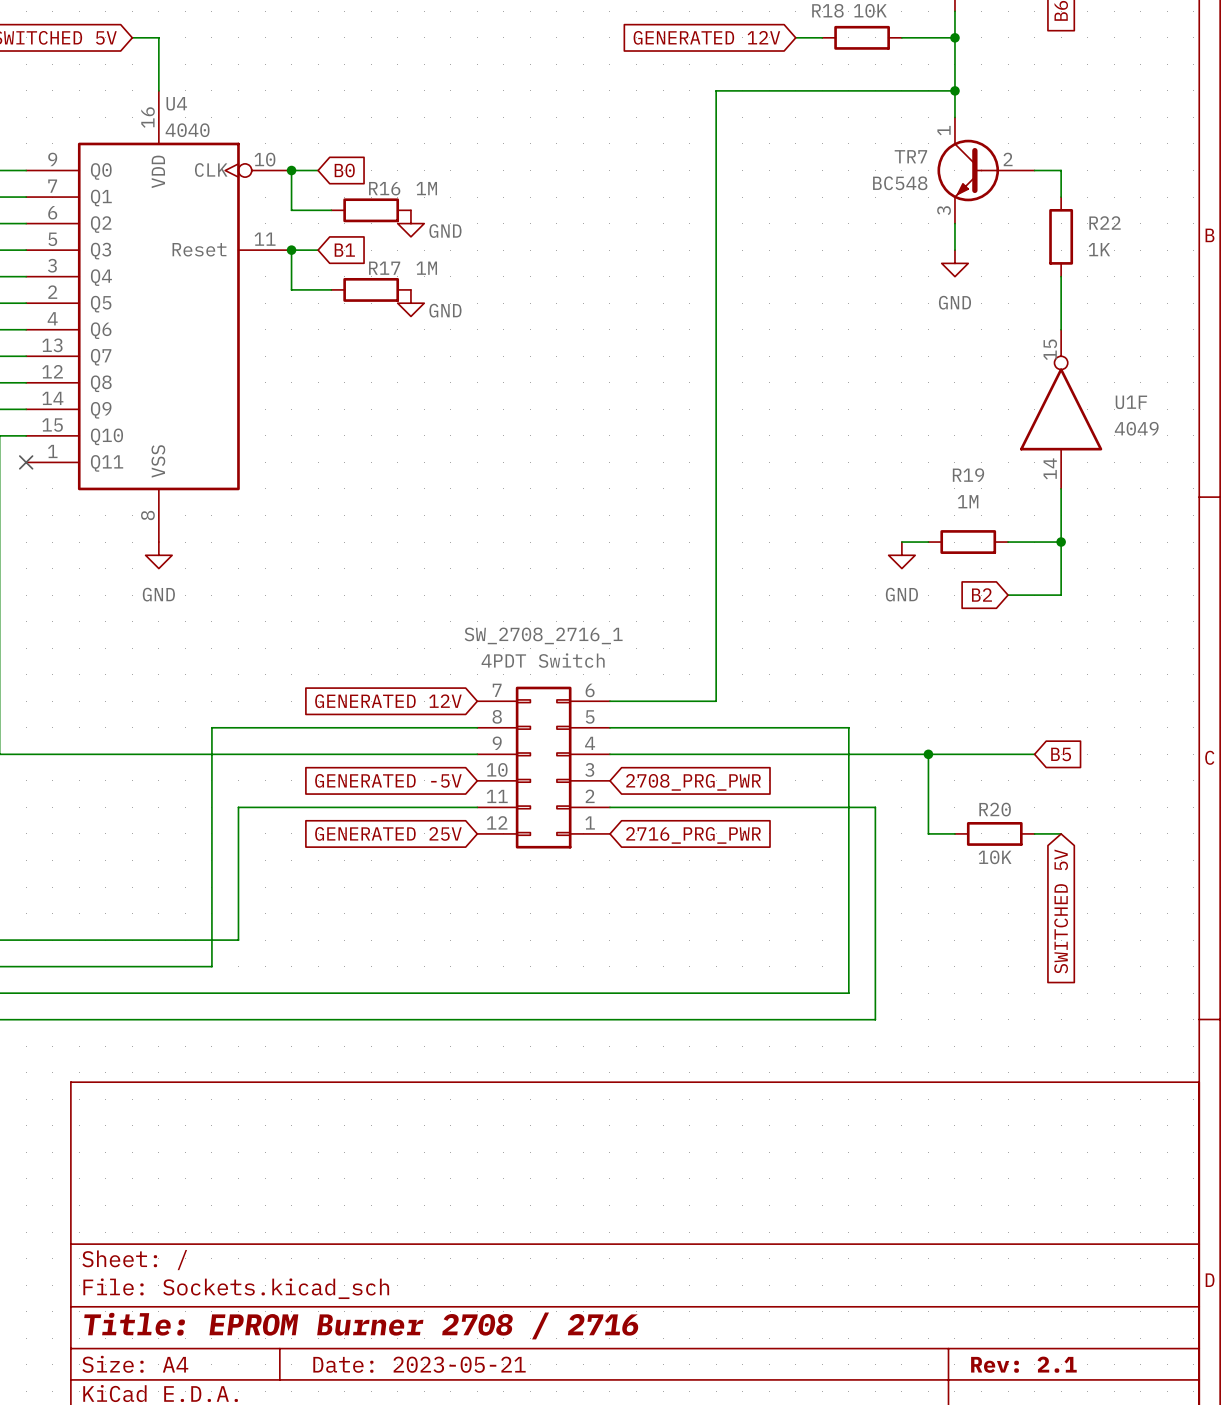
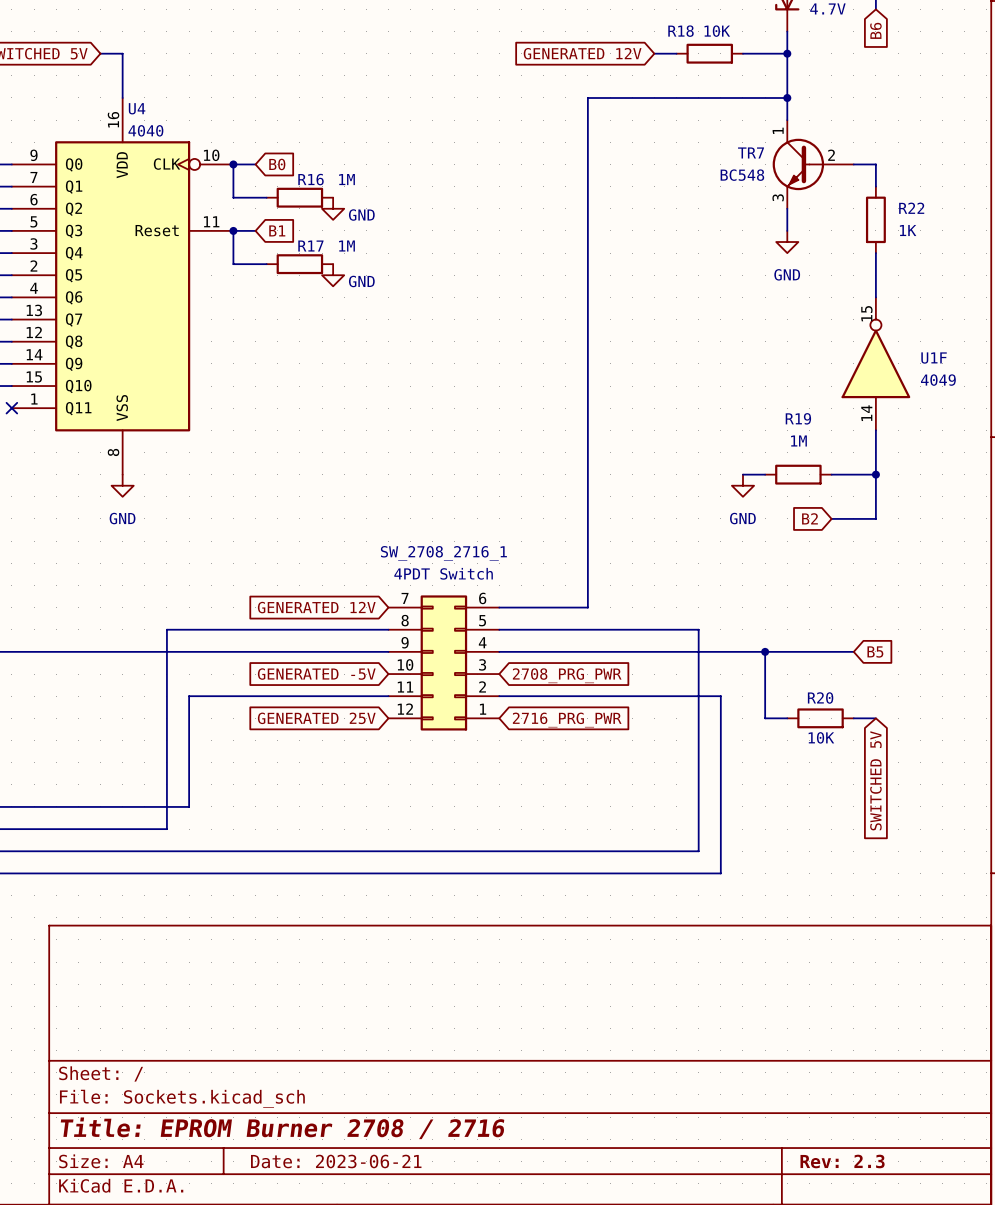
title block: Date: 2023-05-21 (419, 1364) -> Date: 2023-06-21 (336, 1161)
title block: Rev: 2.1 (1023, 1364) -> Rev: 2.3 (842, 1161)

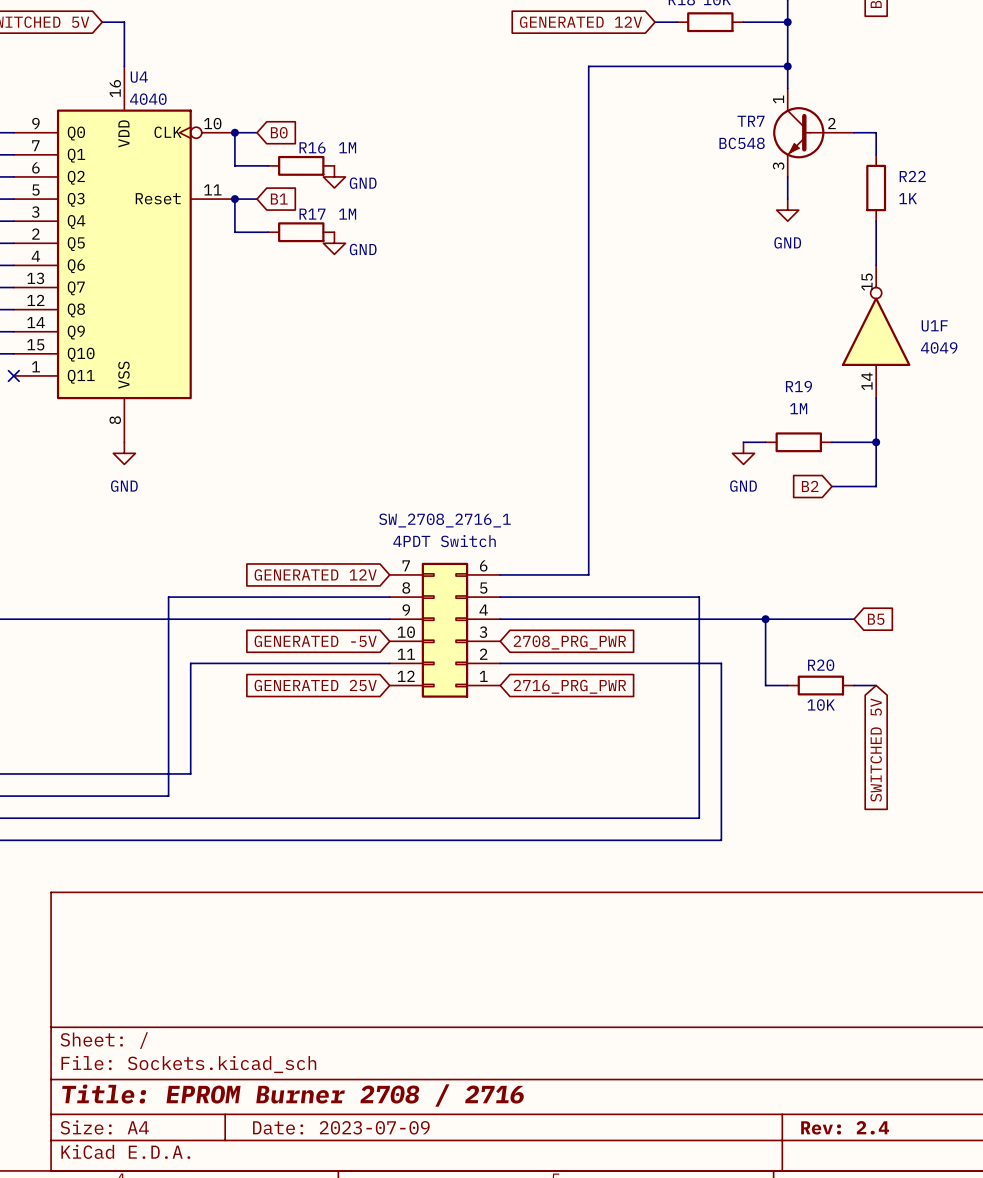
title block: Date: 2023-06-21 (336, 1161) -> Date: 2023-07-09 (341, 1127)
title block: Rev: 2.3 (842, 1161) -> Rev: 2.4 (845, 1127)

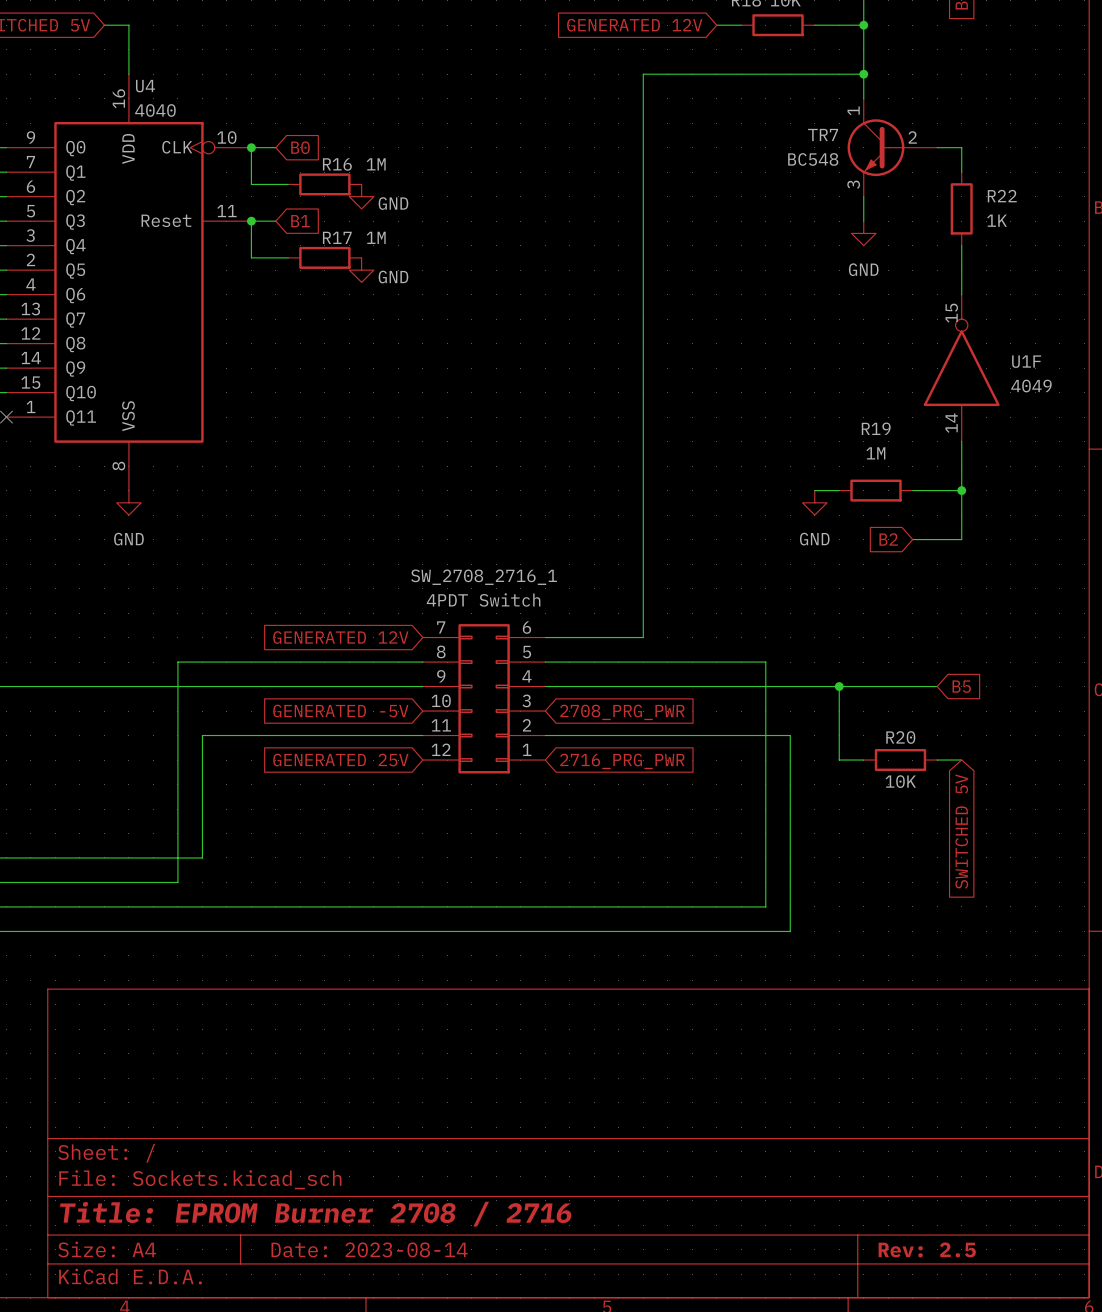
title block: Date: 2023-07-09 (341, 1127) -> Date: 2023-08-14 (369, 1249)
title block: Rev: 2.4 (845, 1127) -> Rev: 2.5 (927, 1249)

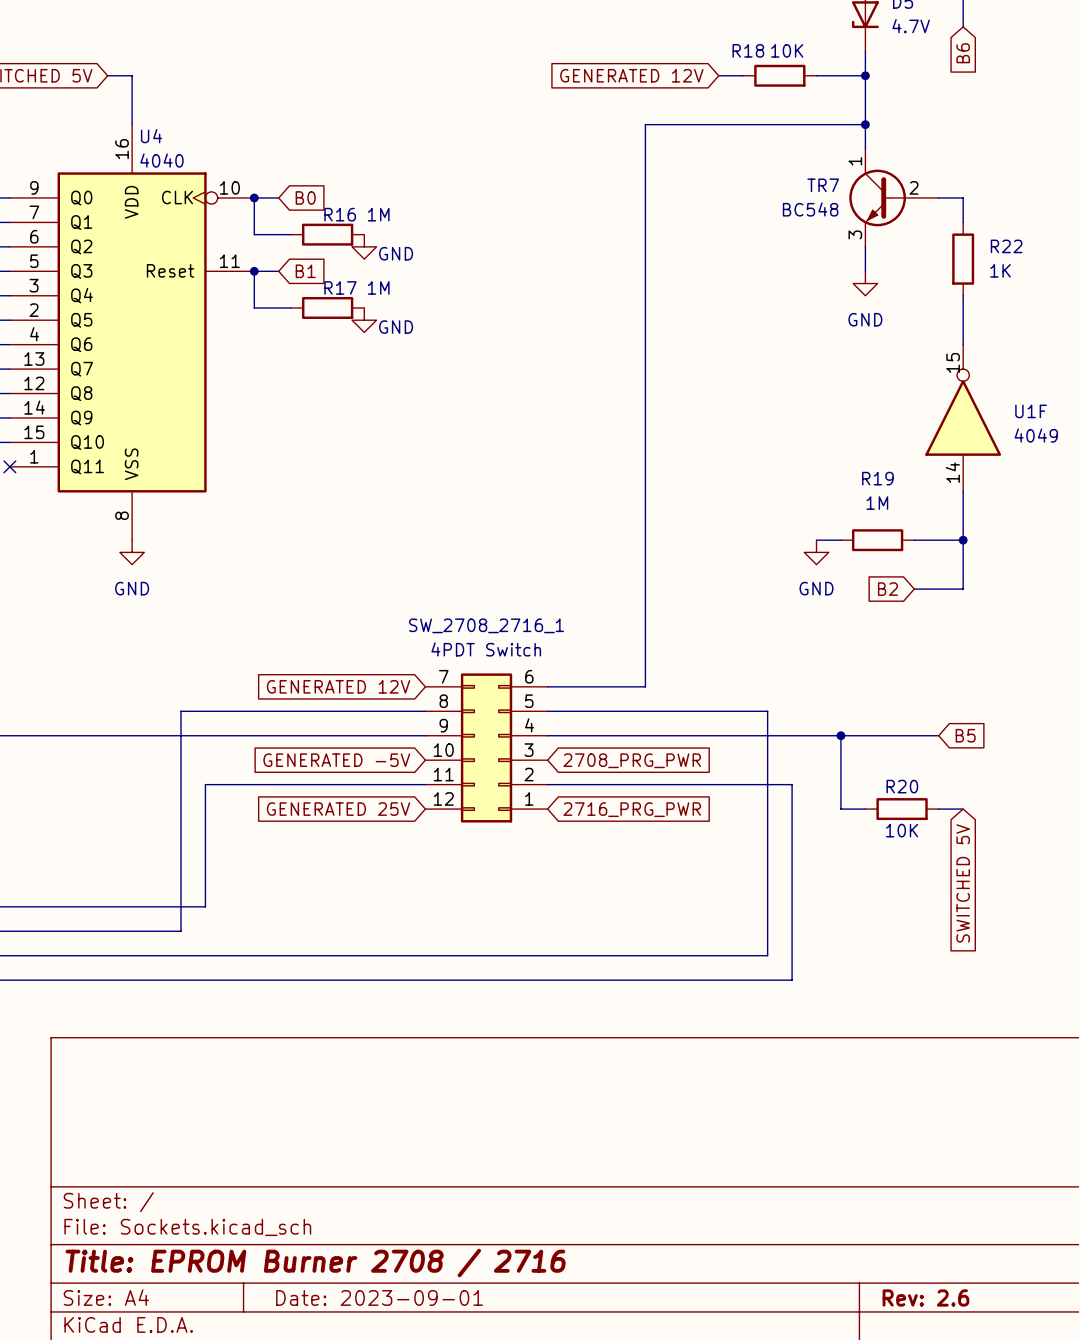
title block: Date: 2023-08-14 (369, 1249) -> Date: 2023-09-01 (379, 1297)
title block: Rev: 2.5 (927, 1249) -> Rev: 2.6 (925, 1297)

